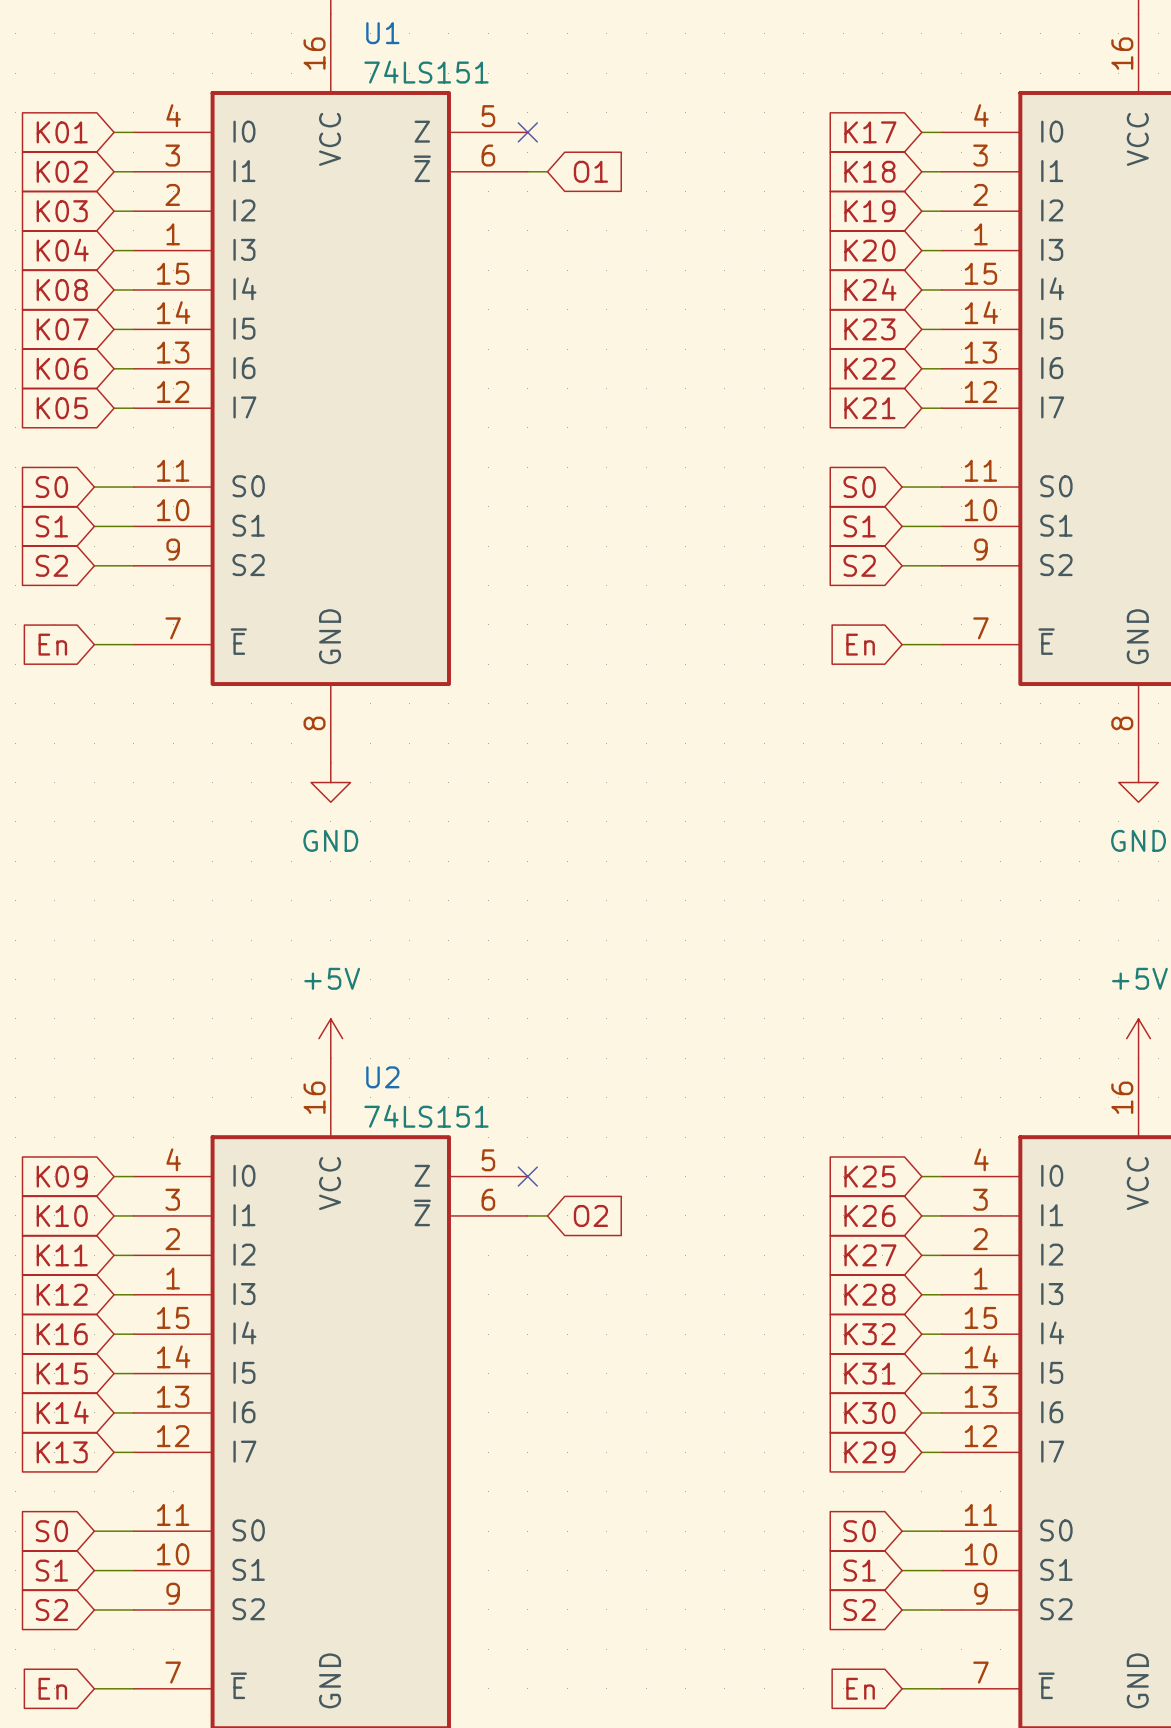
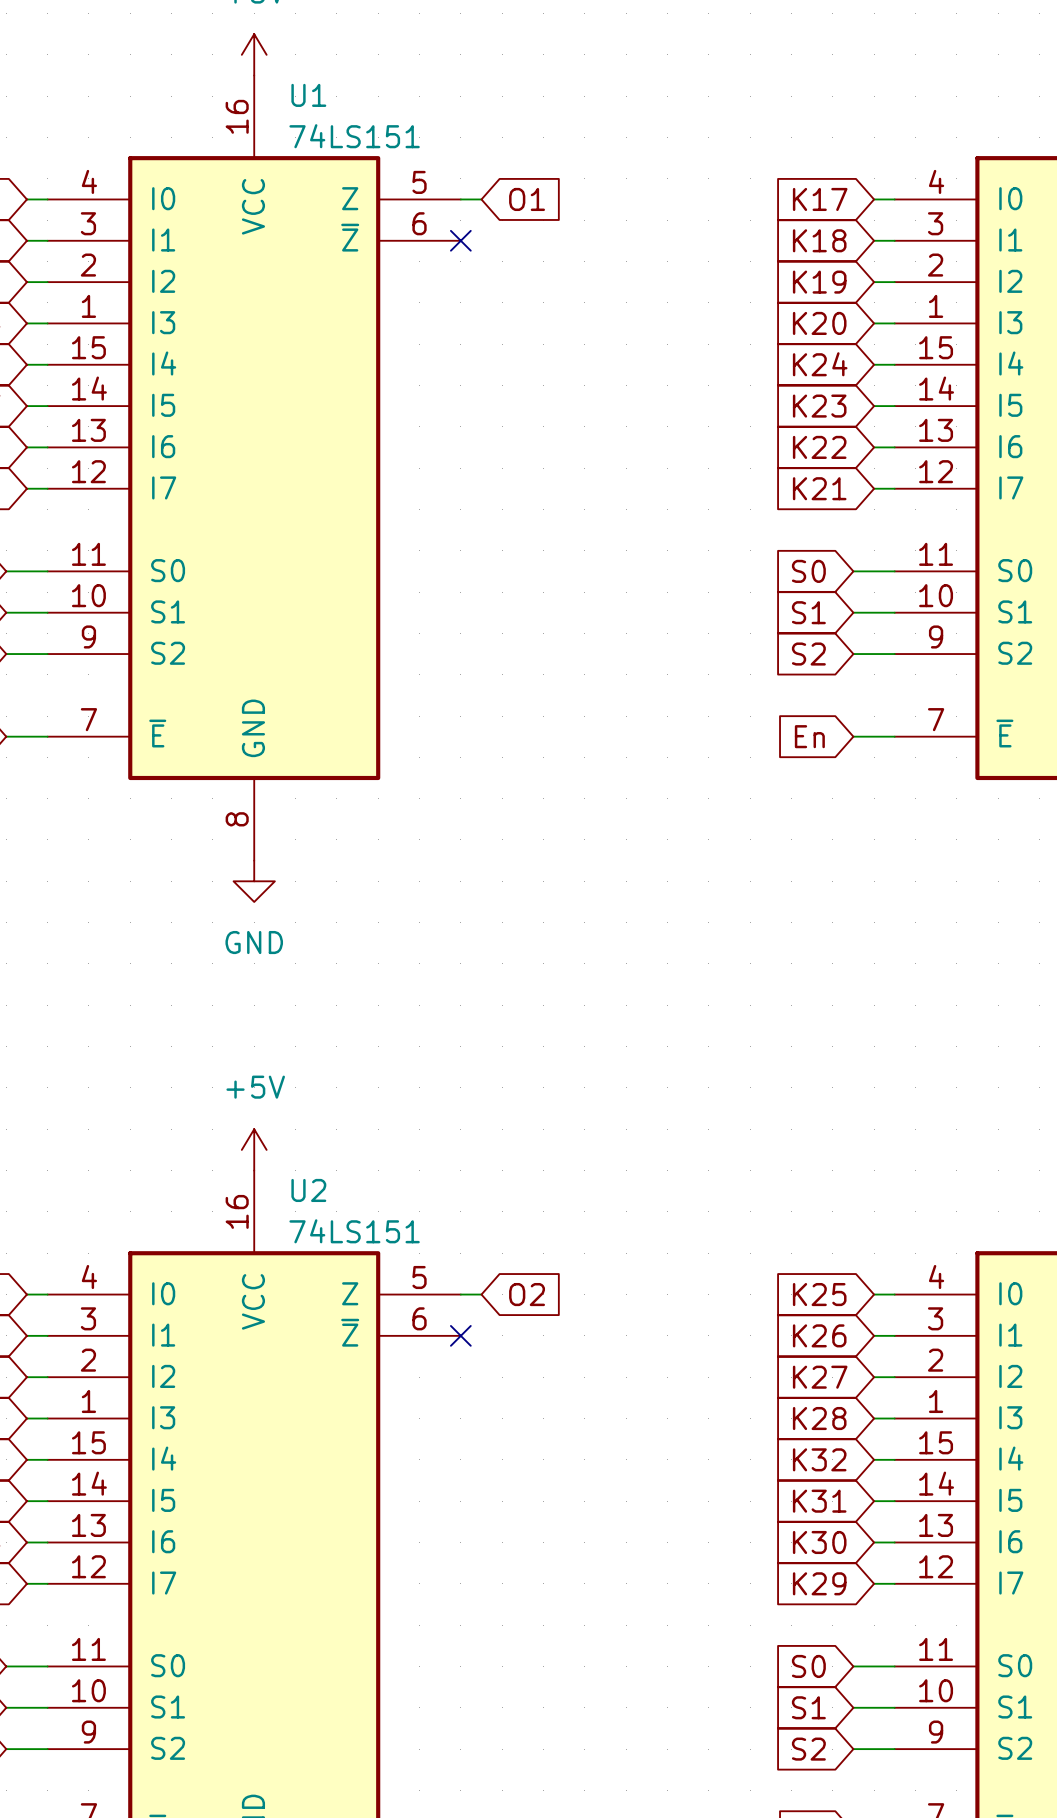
no-connect mark position: (527, 132) -> (460, 240)
wire: (527, 171) (547, 171) -> (460, 199) (481, 199)
global label position: O1 (590, 171) -> O1 (527, 199)
no-connect mark position: (527, 1176) -> (460, 1335)
wire: (527, 1215) (547, 1215) -> (460, 1294) (481, 1294)
global label position: O2 (590, 1215) -> O2 (527, 1294)

